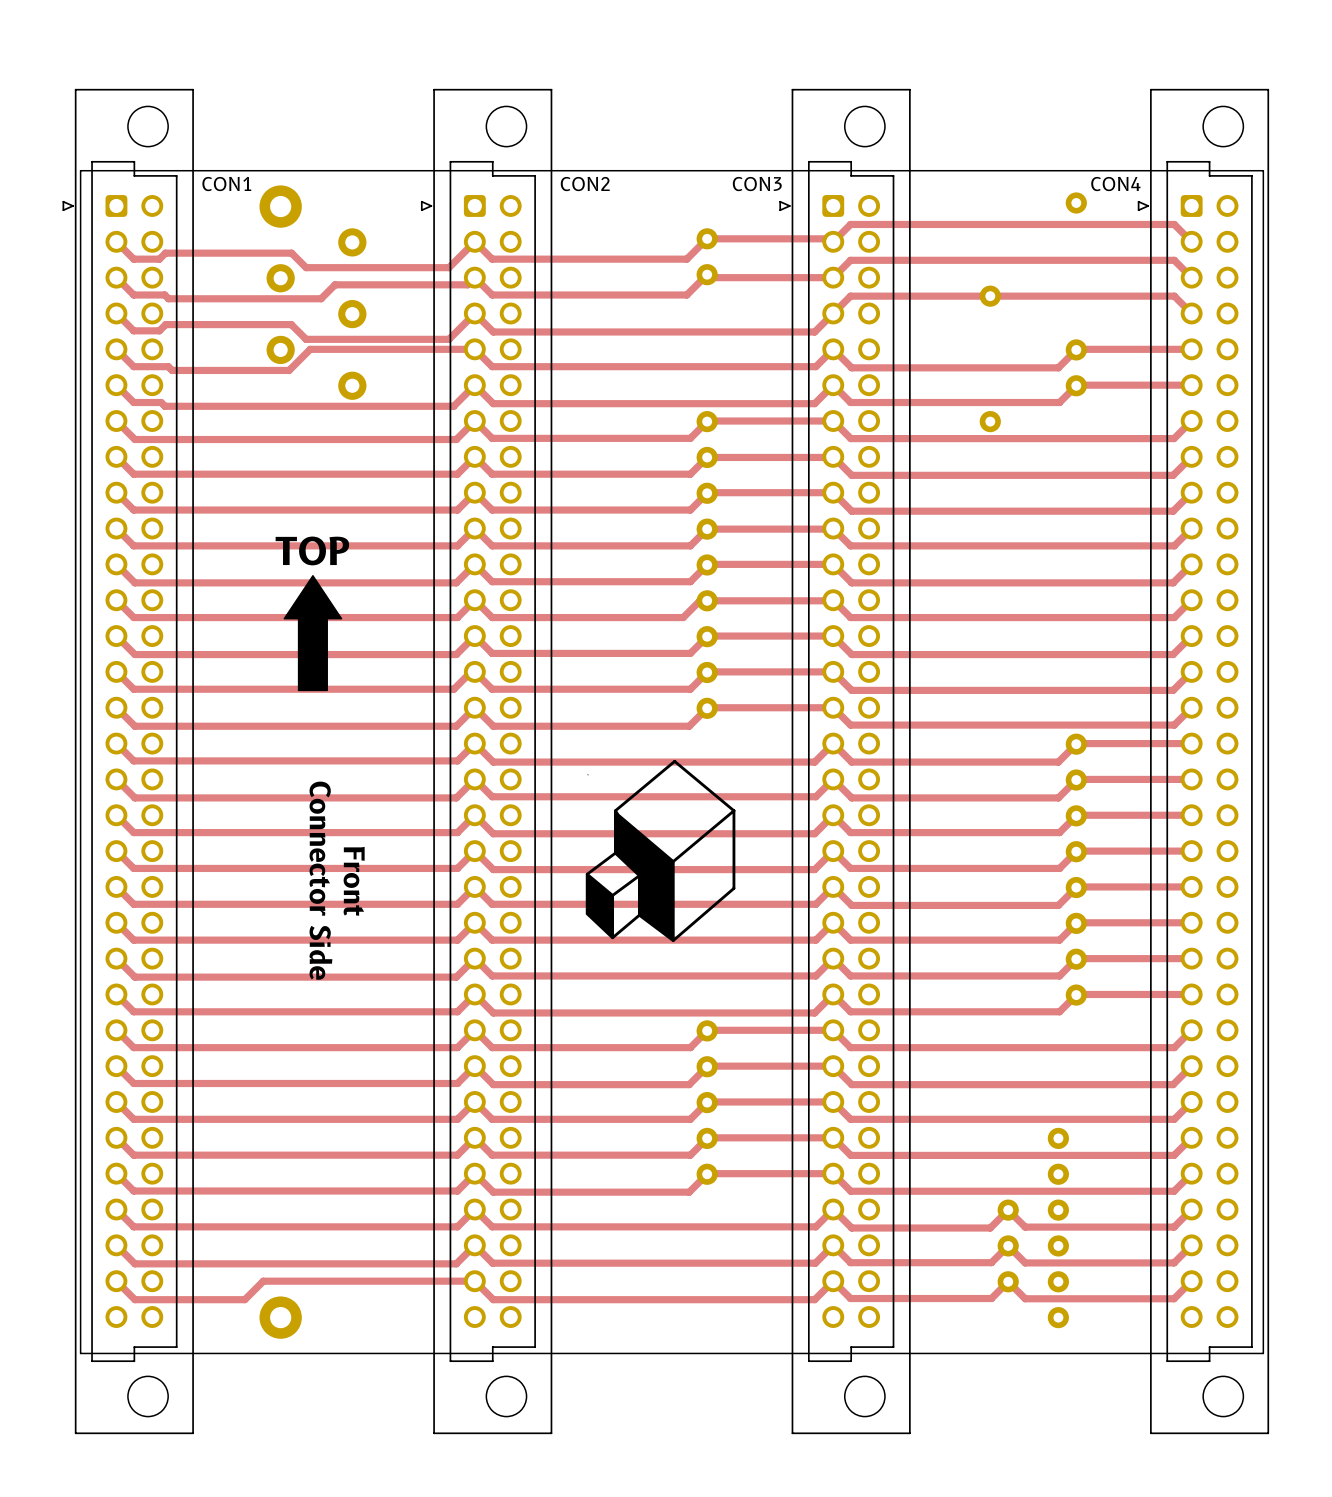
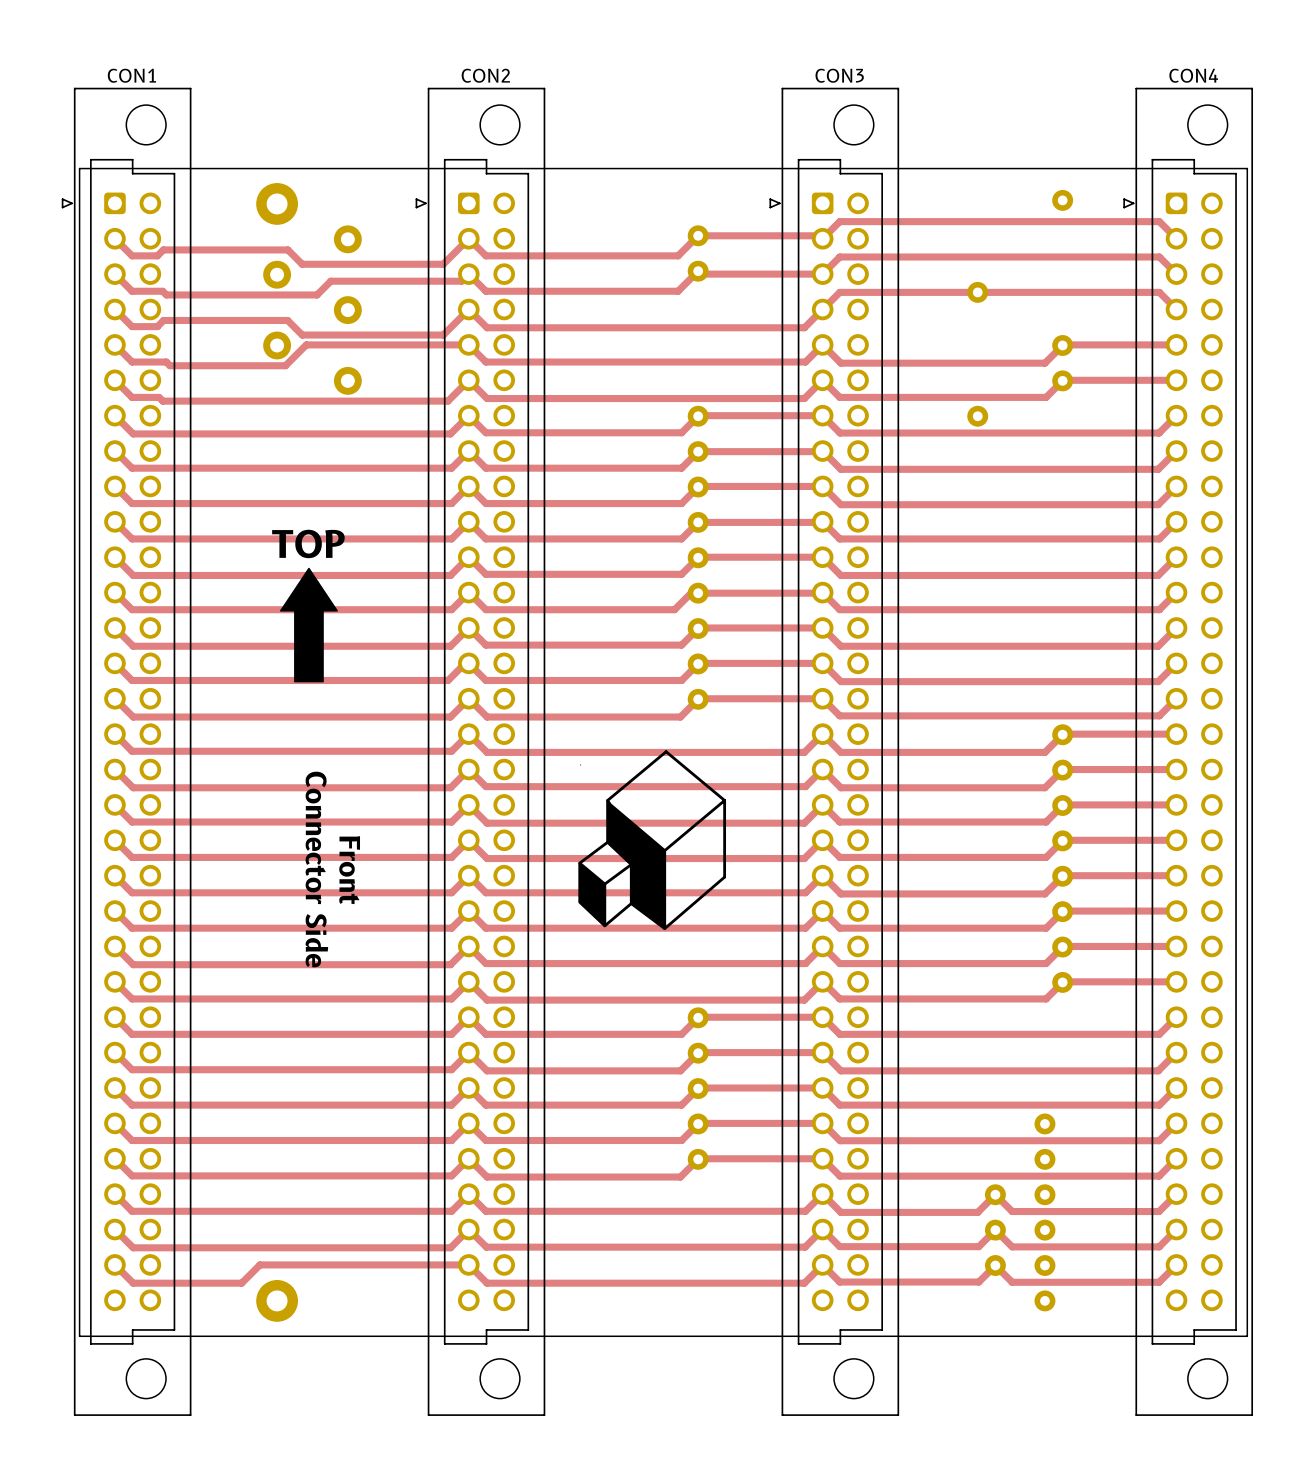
CON1 name position: CON1 (226, 184) -> CON1 (131, 75)
CON2 name position: CON2 (585, 184) -> CON2 (485, 75)
CON3 name position: CON3 (757, 184) -> CON3 (839, 75)
CON4 name position: CON4 (1115, 184) -> CON4 (1193, 75)

